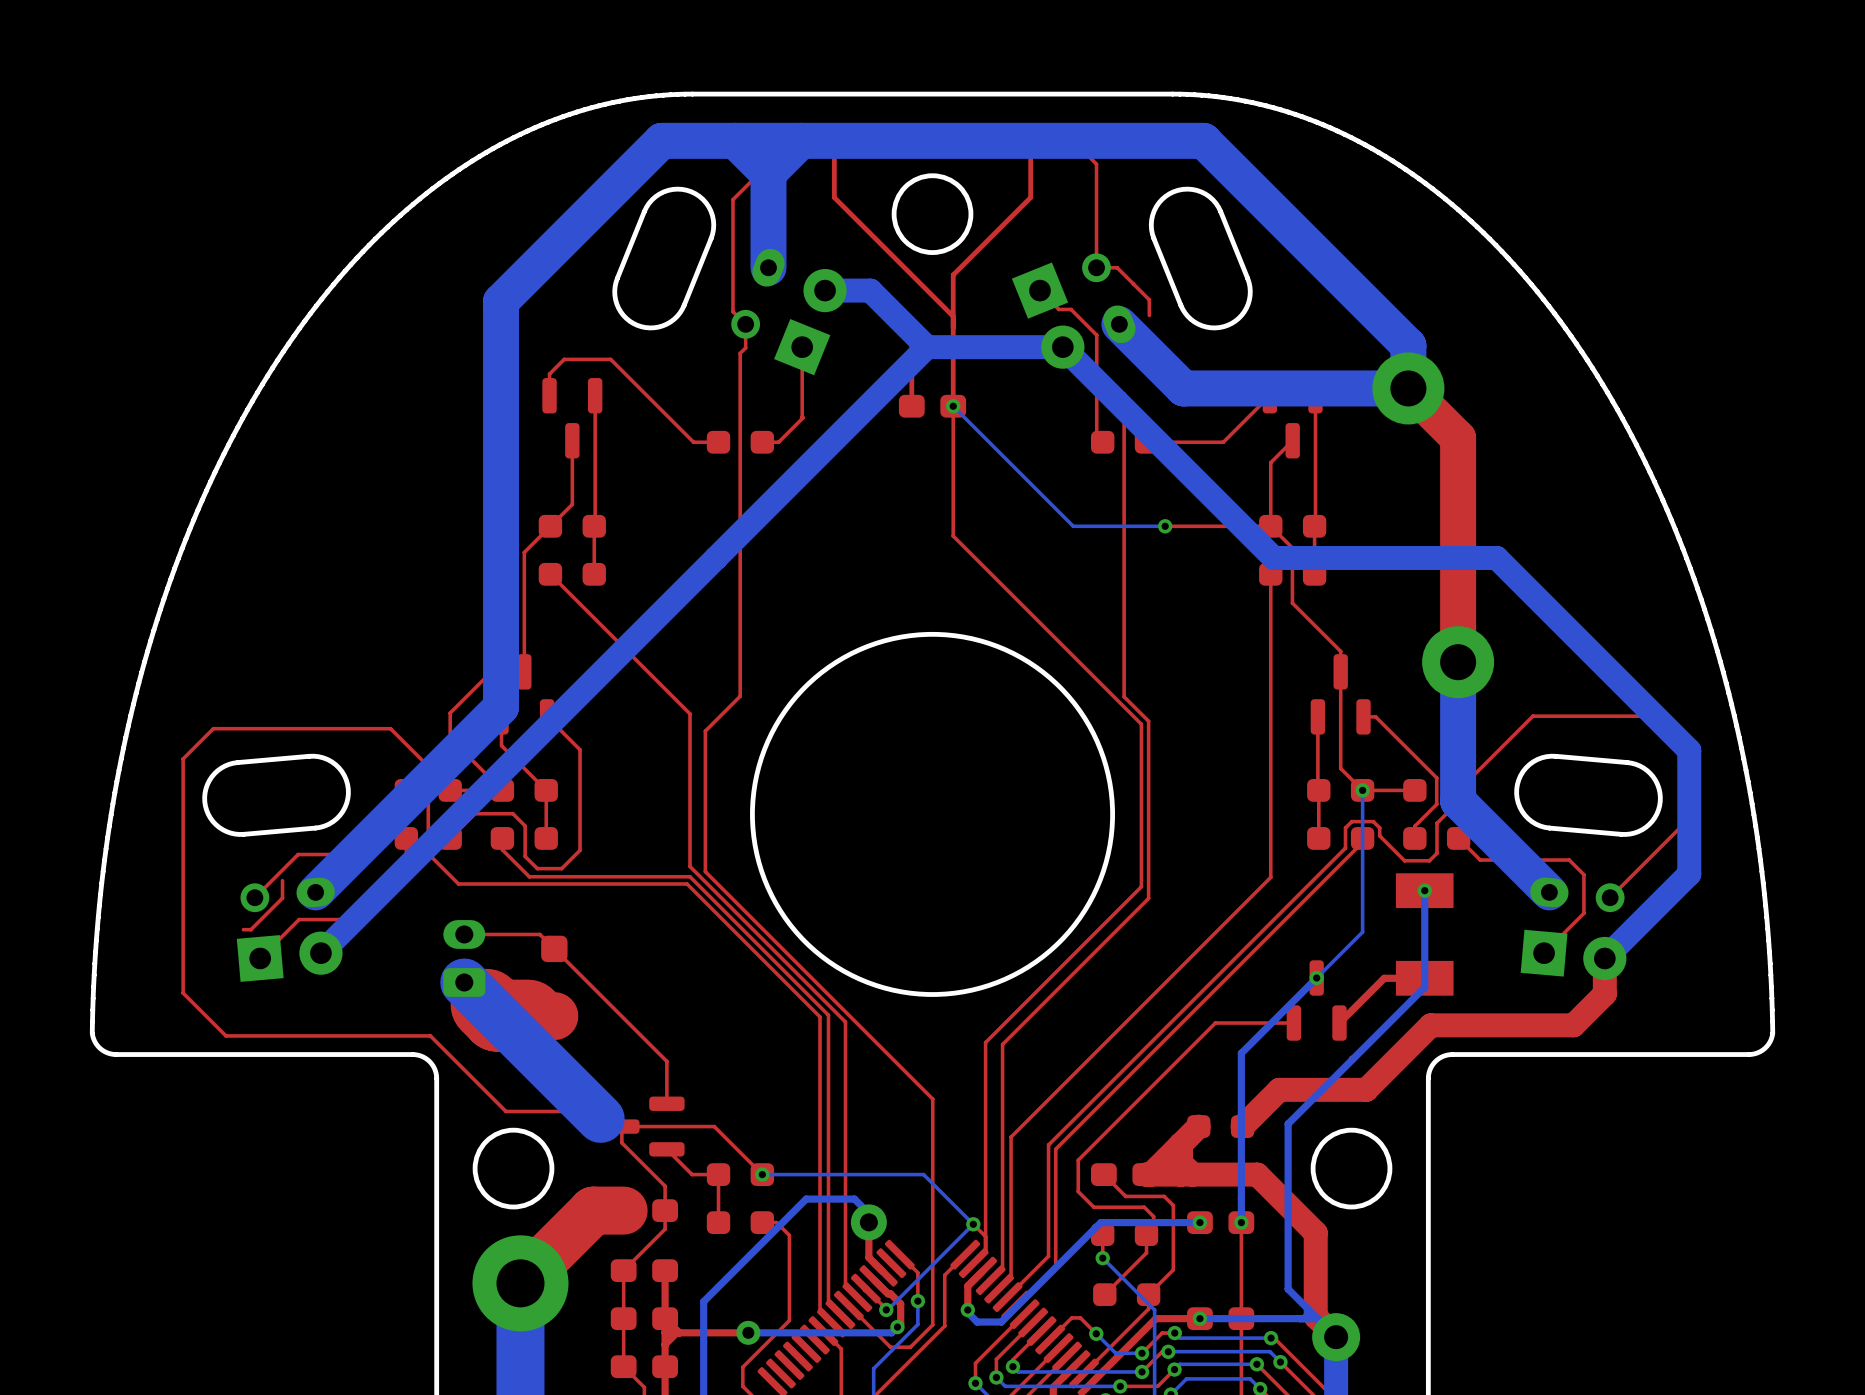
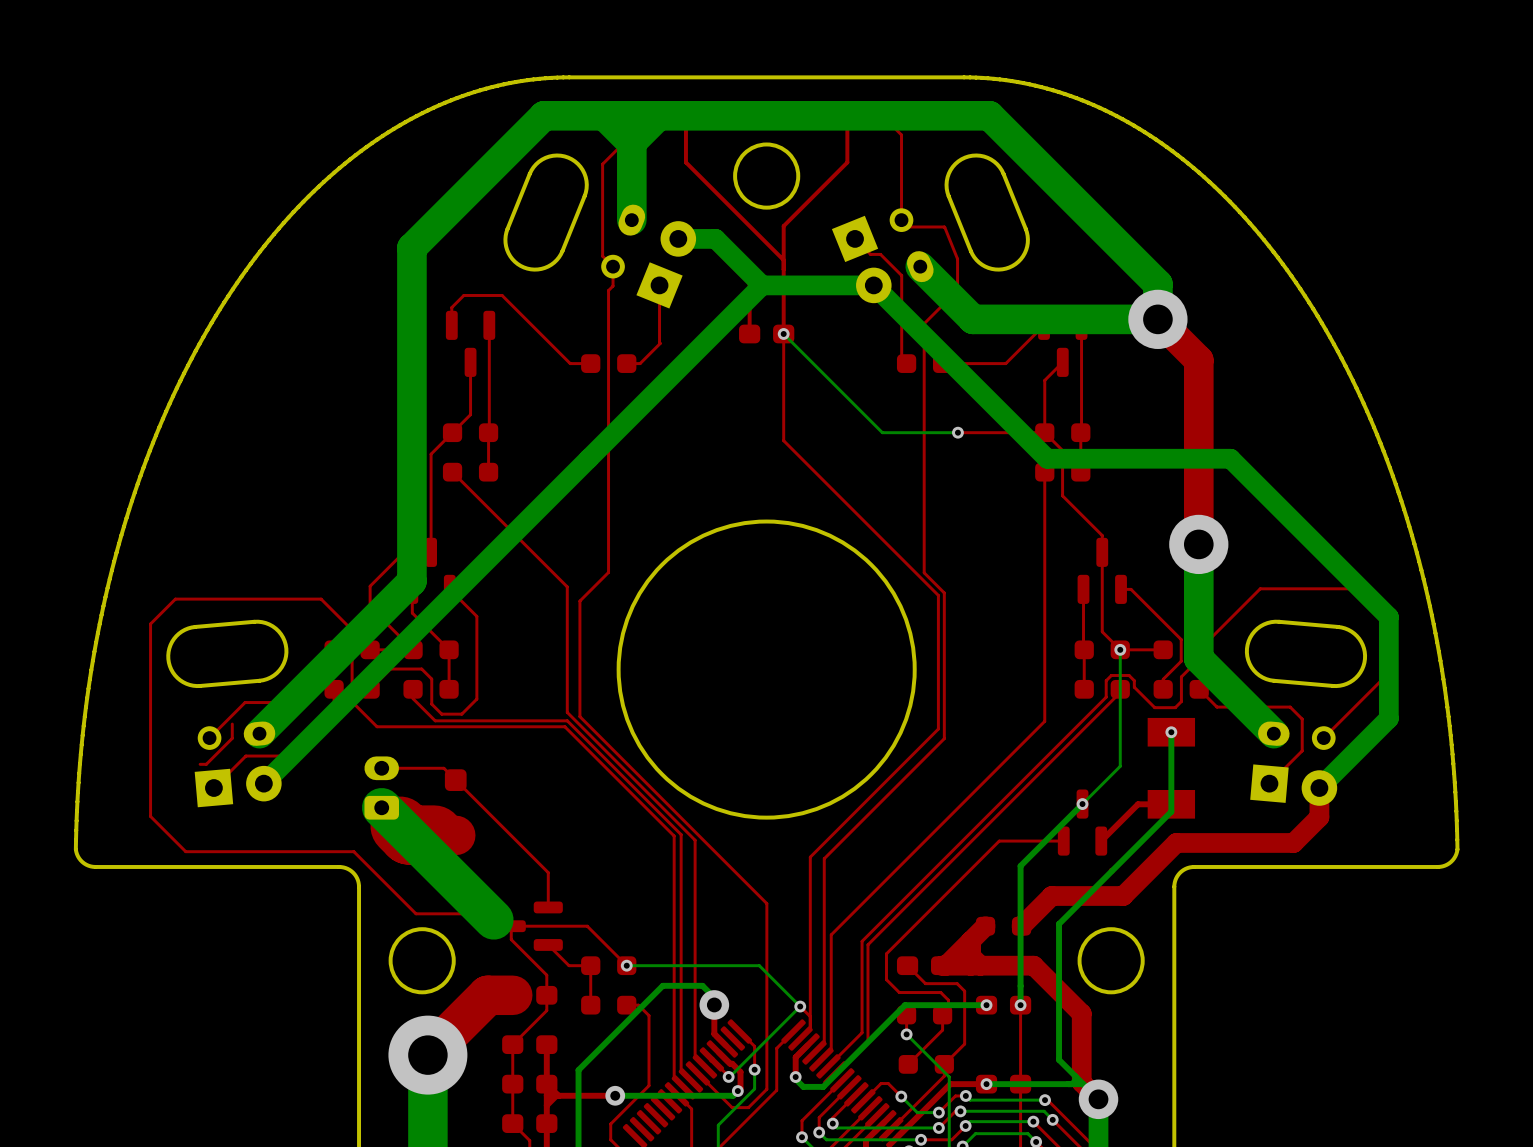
top track: (1096, 267) (1117, 267) (1149, 299) (1149, 315) -> none
top track: none -> (908, 226) (944, 226) (957, 259) (957, 290) (924, 323)

